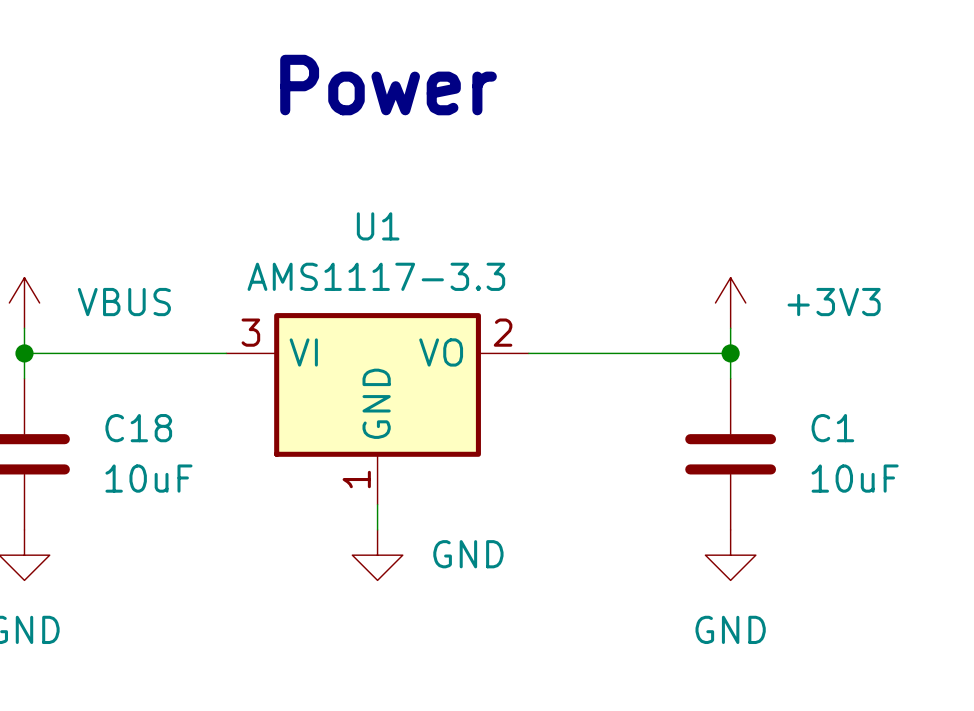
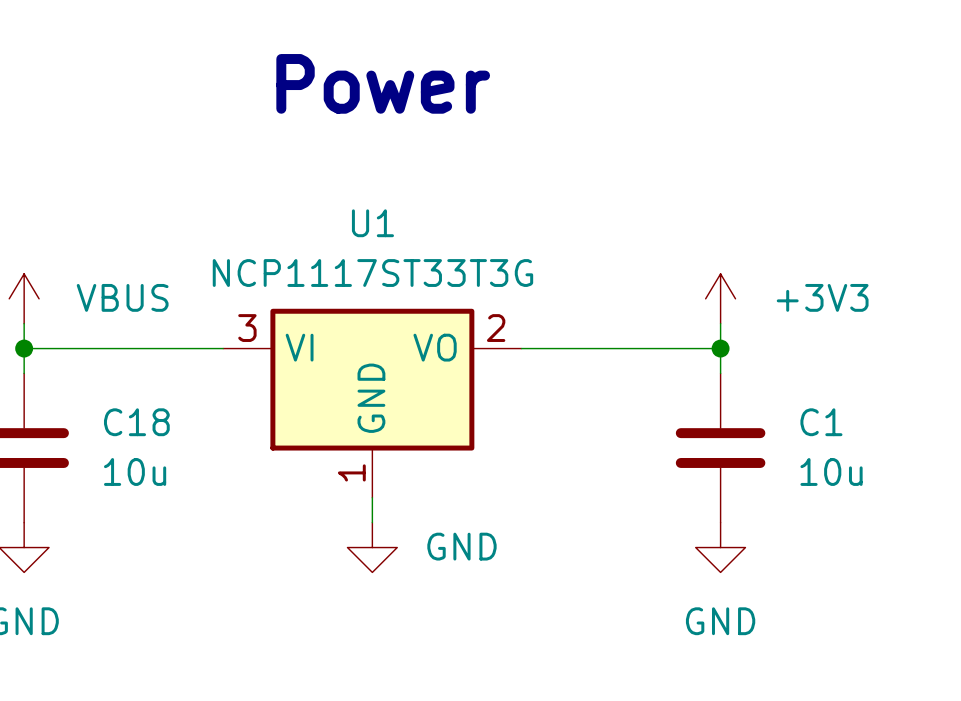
U1 value: AMS1117-3.3 (376, 276) -> NCP1117ST33T3G (372, 273)
C18 value: 10uF (148, 478) -> 10u (135, 471)
C1 value: 10uF (855, 478) -> 10u (831, 471)

